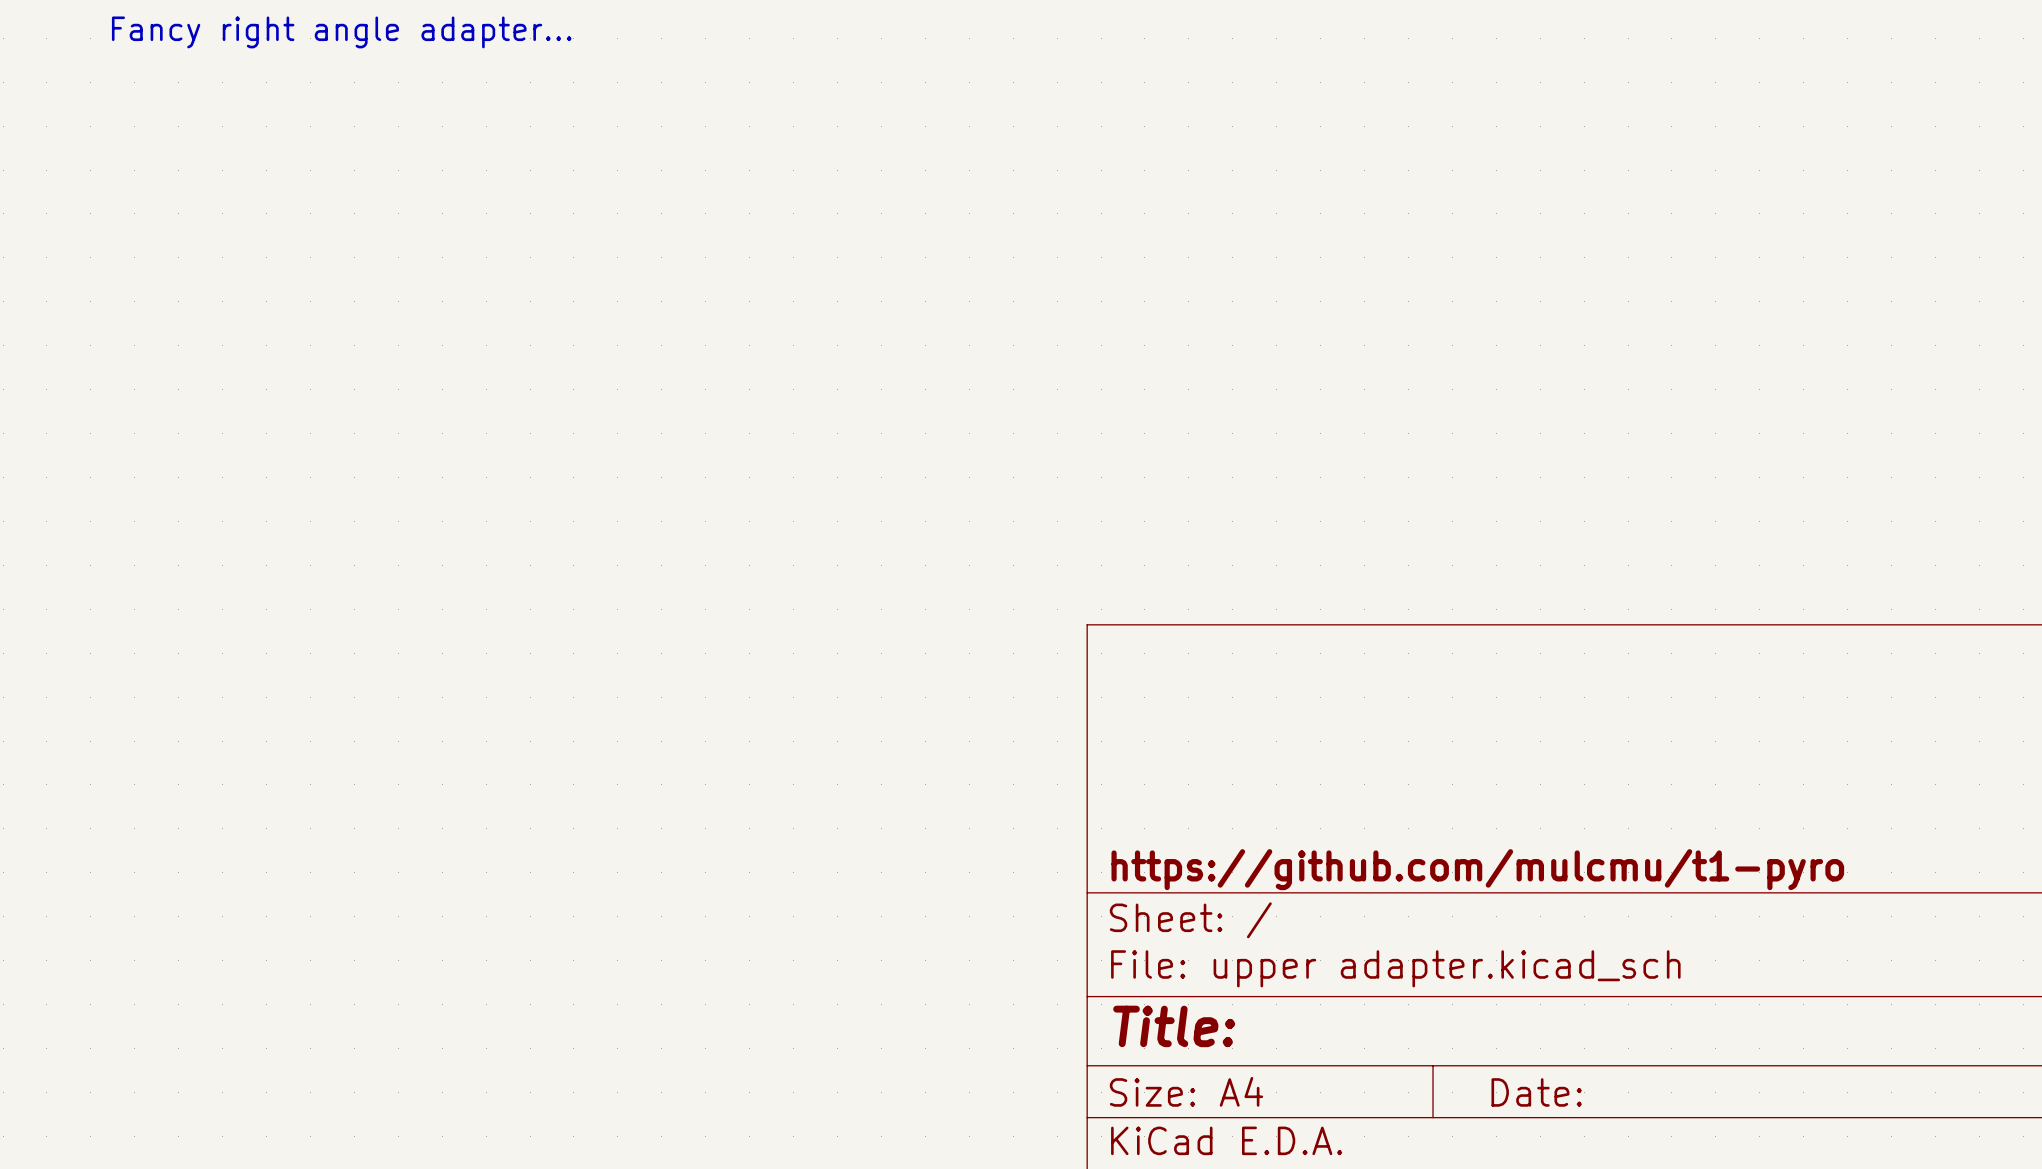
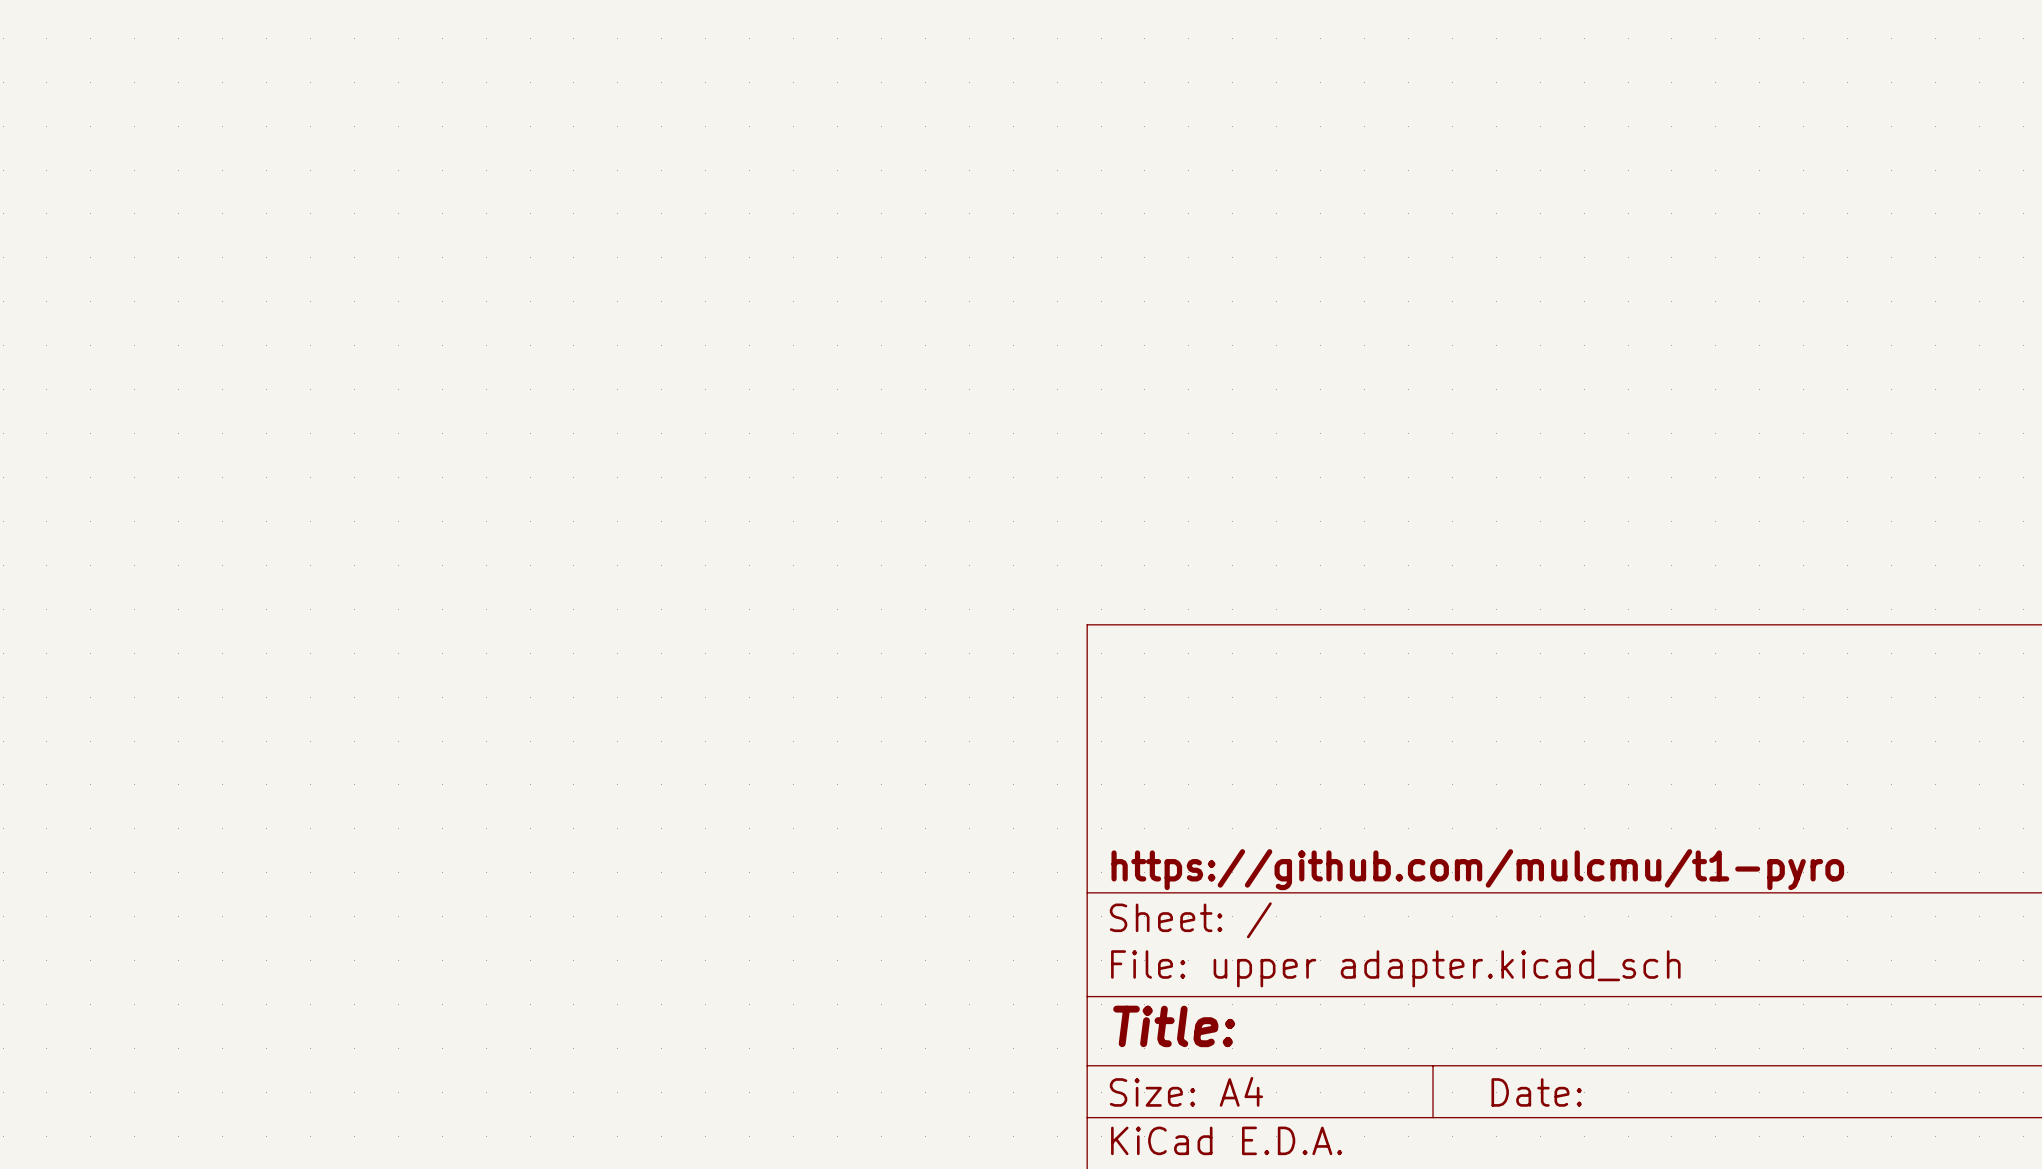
text: Fancy right angle adapter... (341, 32) -> none

